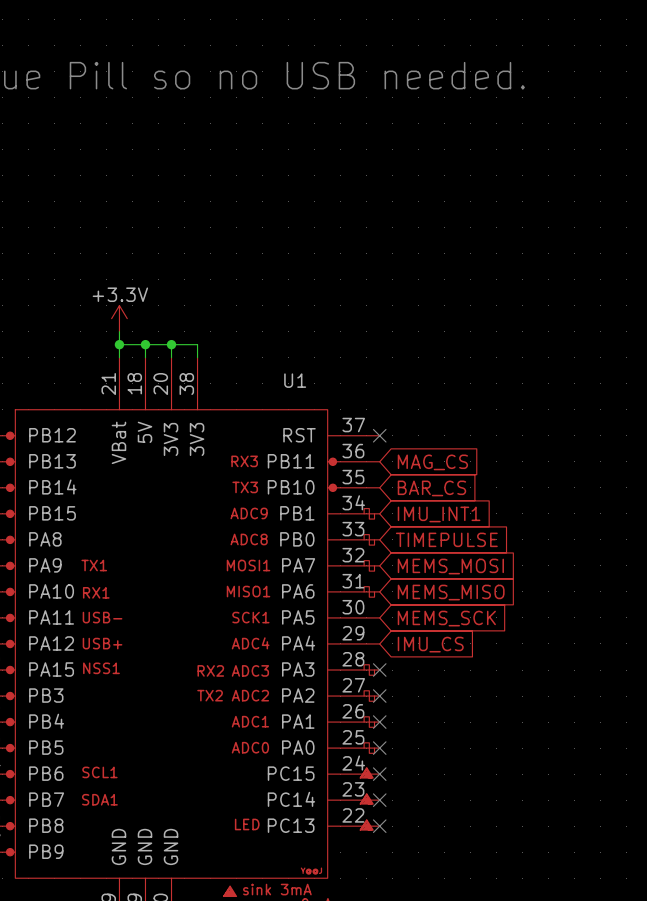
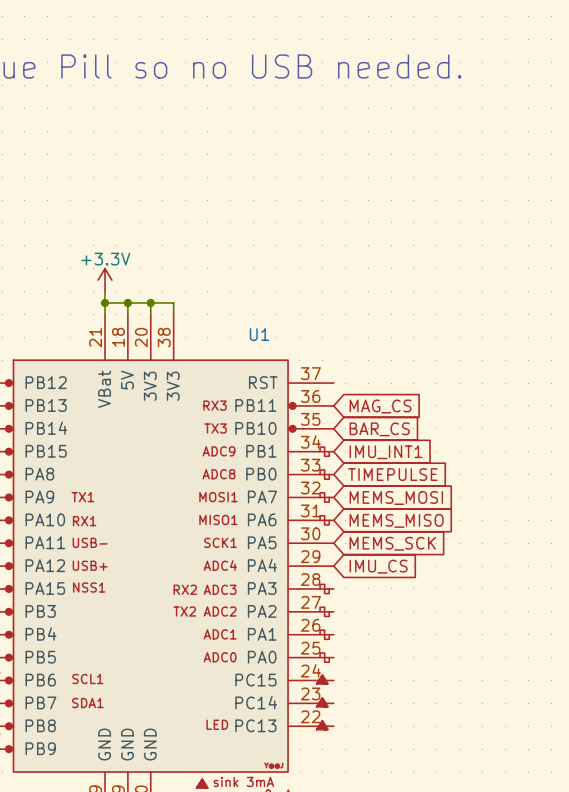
no-connect mark: (379, 435) -> none
no-connect mark: (379, 670) -> none
no-connect mark: (379, 696) -> none
no-connect mark: (379, 722) -> none
no-connect mark: (379, 748) -> none
no-connect mark: (379, 774) -> none
no-connect mark: (379, 800) -> none
no-connect mark: (379, 826) -> none

